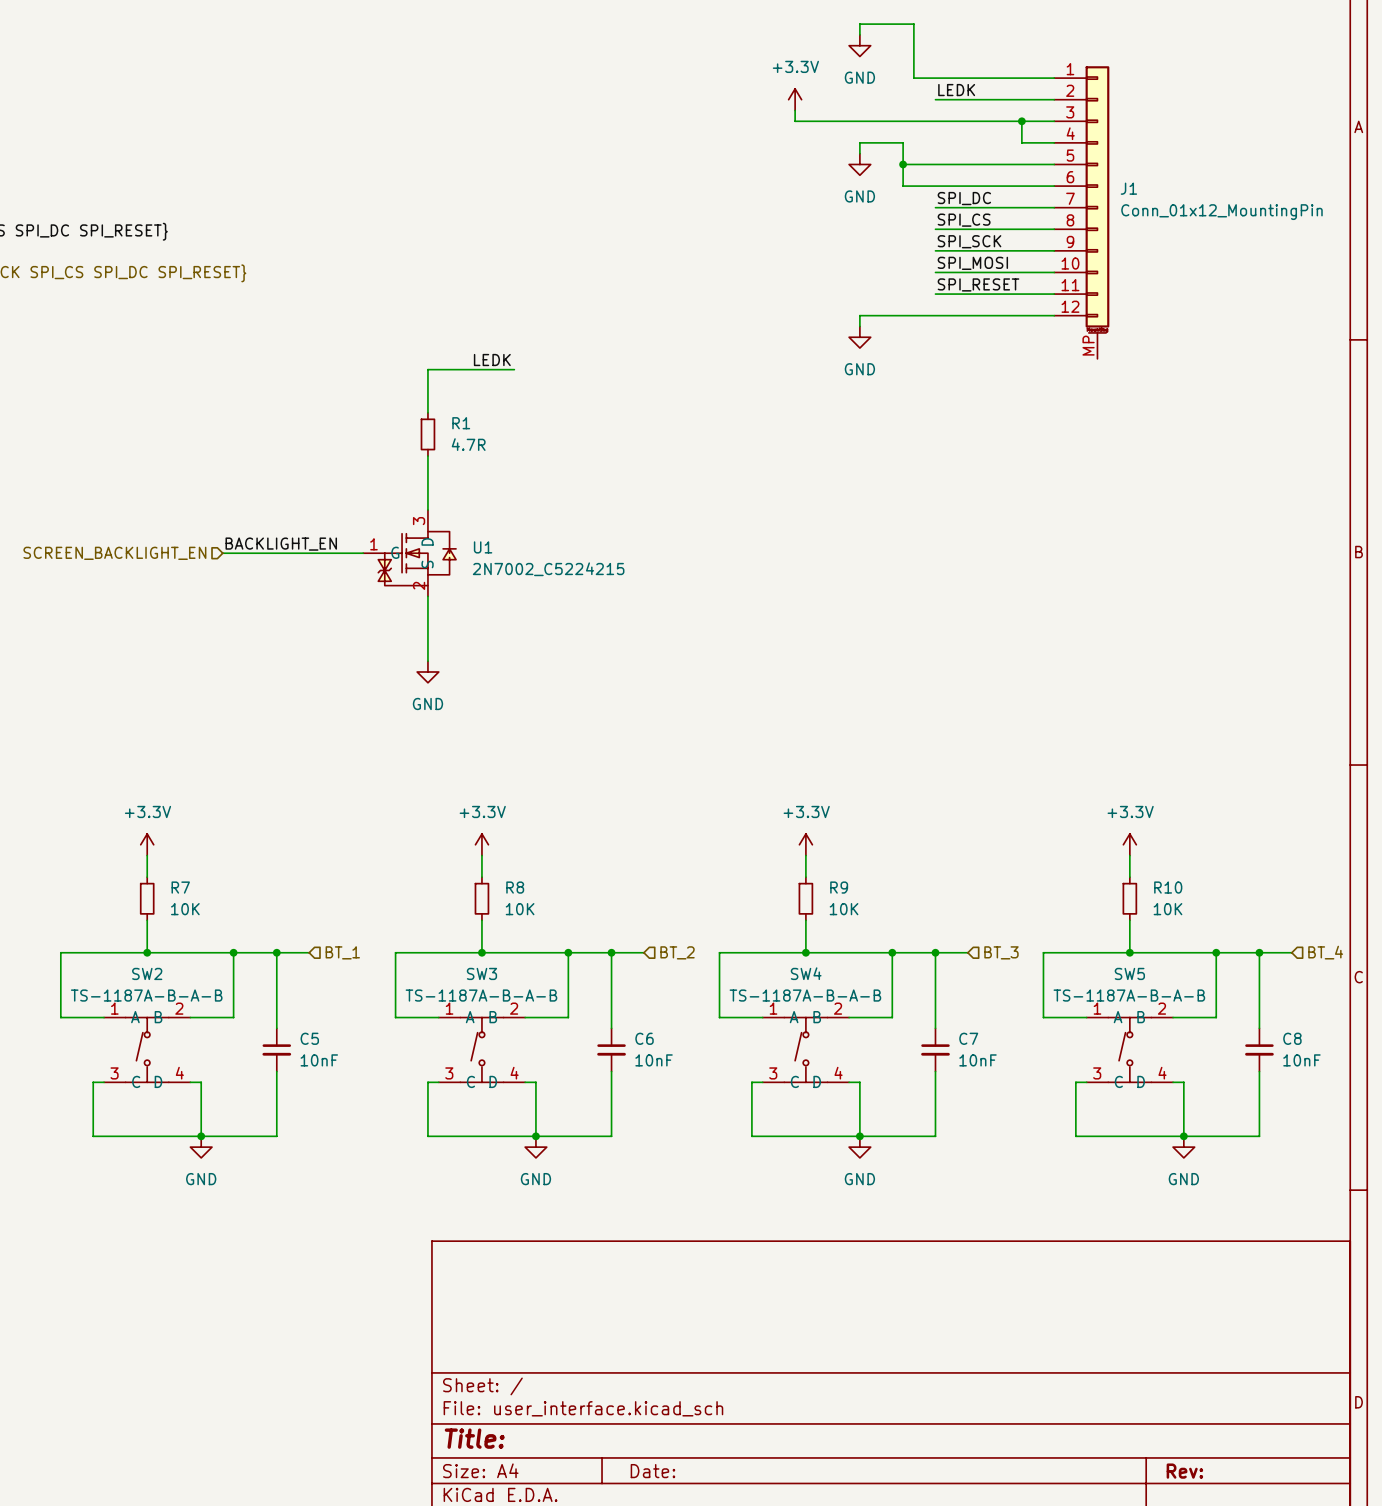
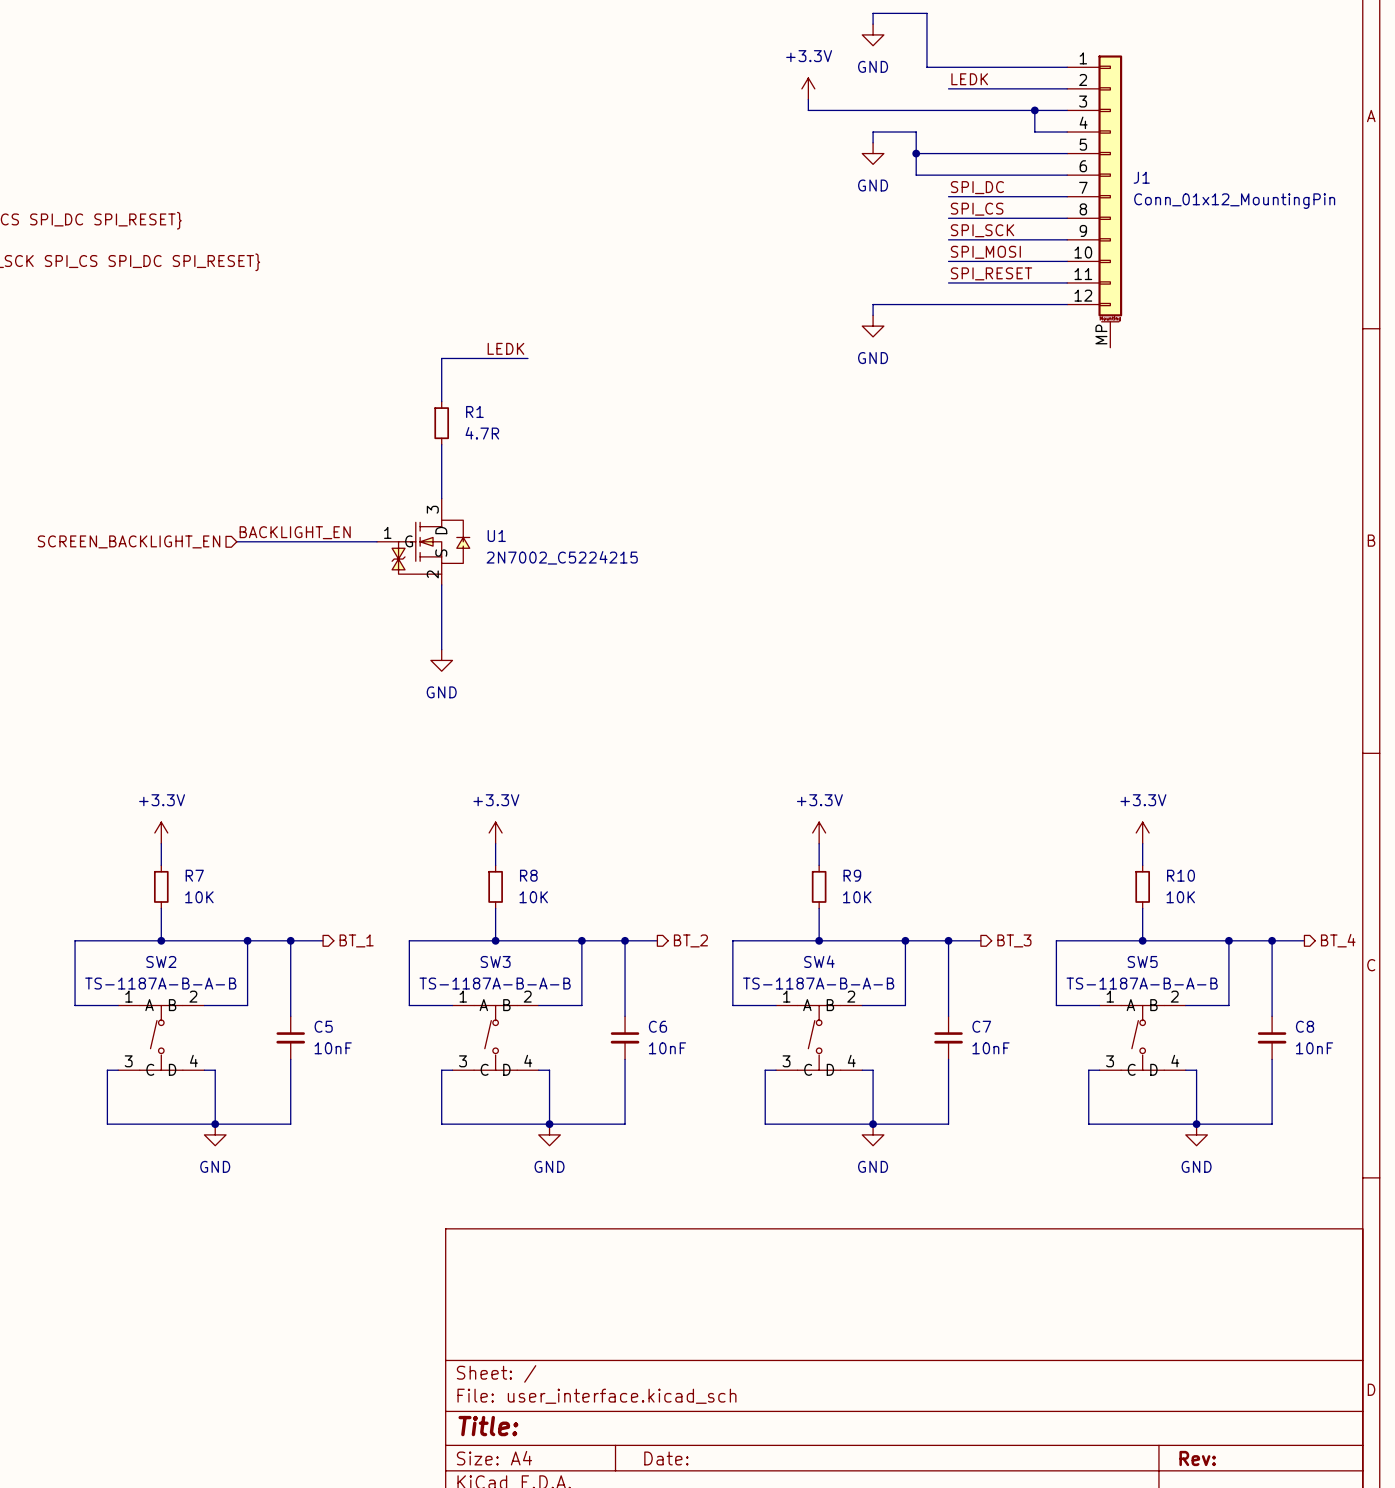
hierarchical label shape: input (342, 952) -> output (356, 940)
hierarchical label shape: input (677, 952) -> output (690, 940)
hierarchical label shape: input (1001, 952) -> output (1014, 940)
hierarchical label shape: input (1325, 952) -> output (1338, 940)

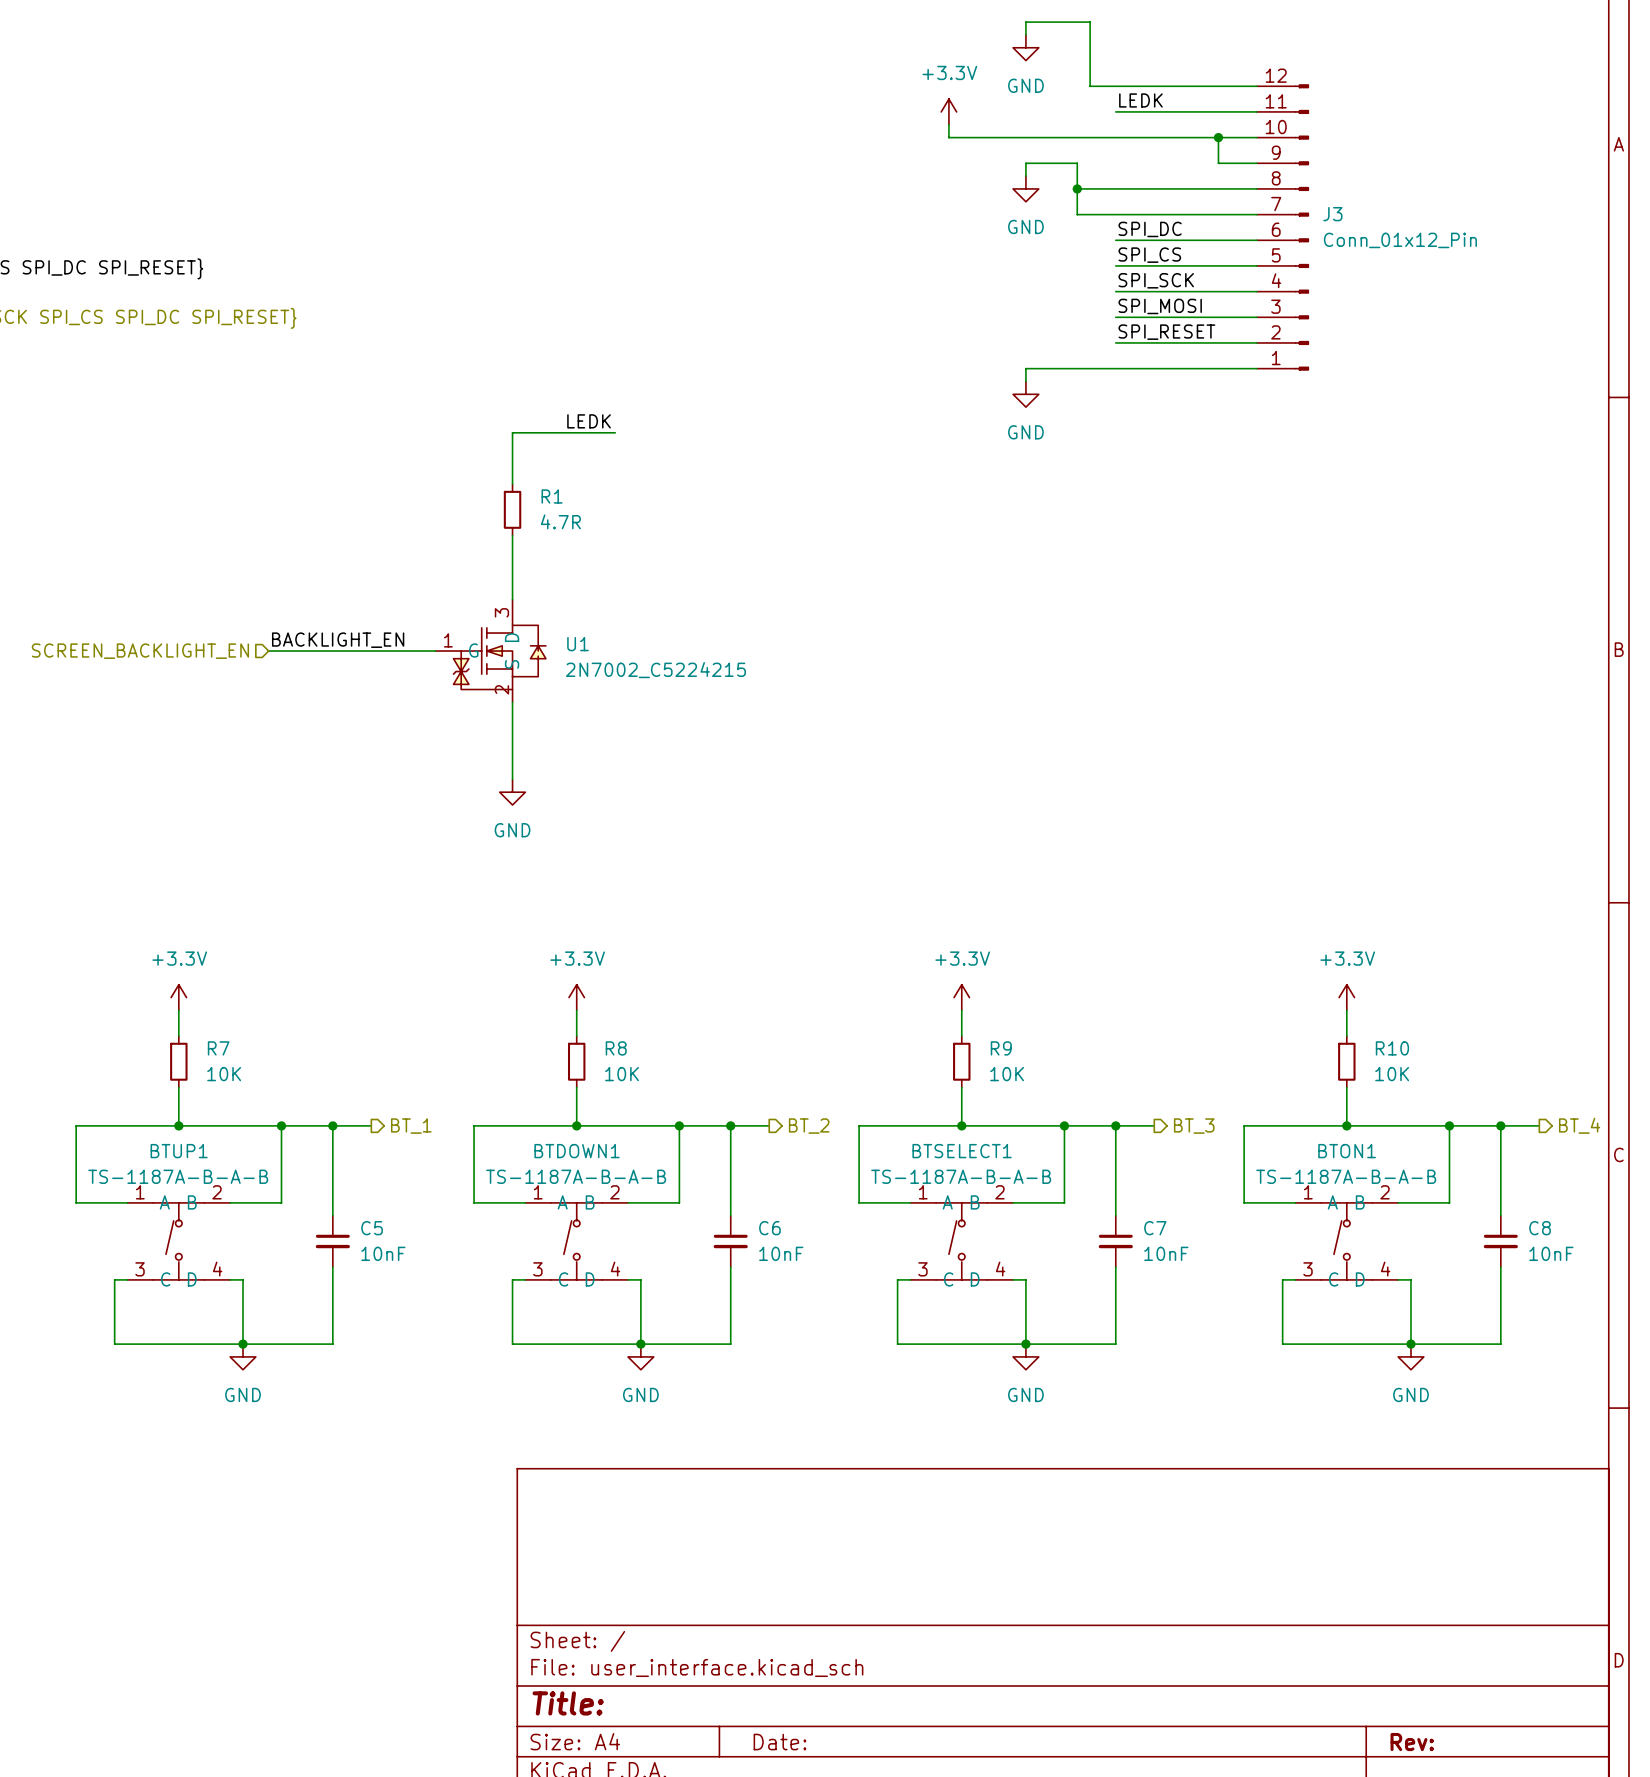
J3: none -> Conn_01x12_Pin (1283, 227)
J1: Conn_01x12_MountingPin (1094, 201) -> none
SW2 name: SW2 (161, 961) -> BTUP1 (179, 1151)
SW3 name: SW3 (495, 961) -> BTDOWN1 (577, 1151)
SW4 name: SW4 (819, 961) -> BTSELECT1 (962, 1151)
SW5 name: SW5 (1142, 961) -> BTON1 (1347, 1151)

